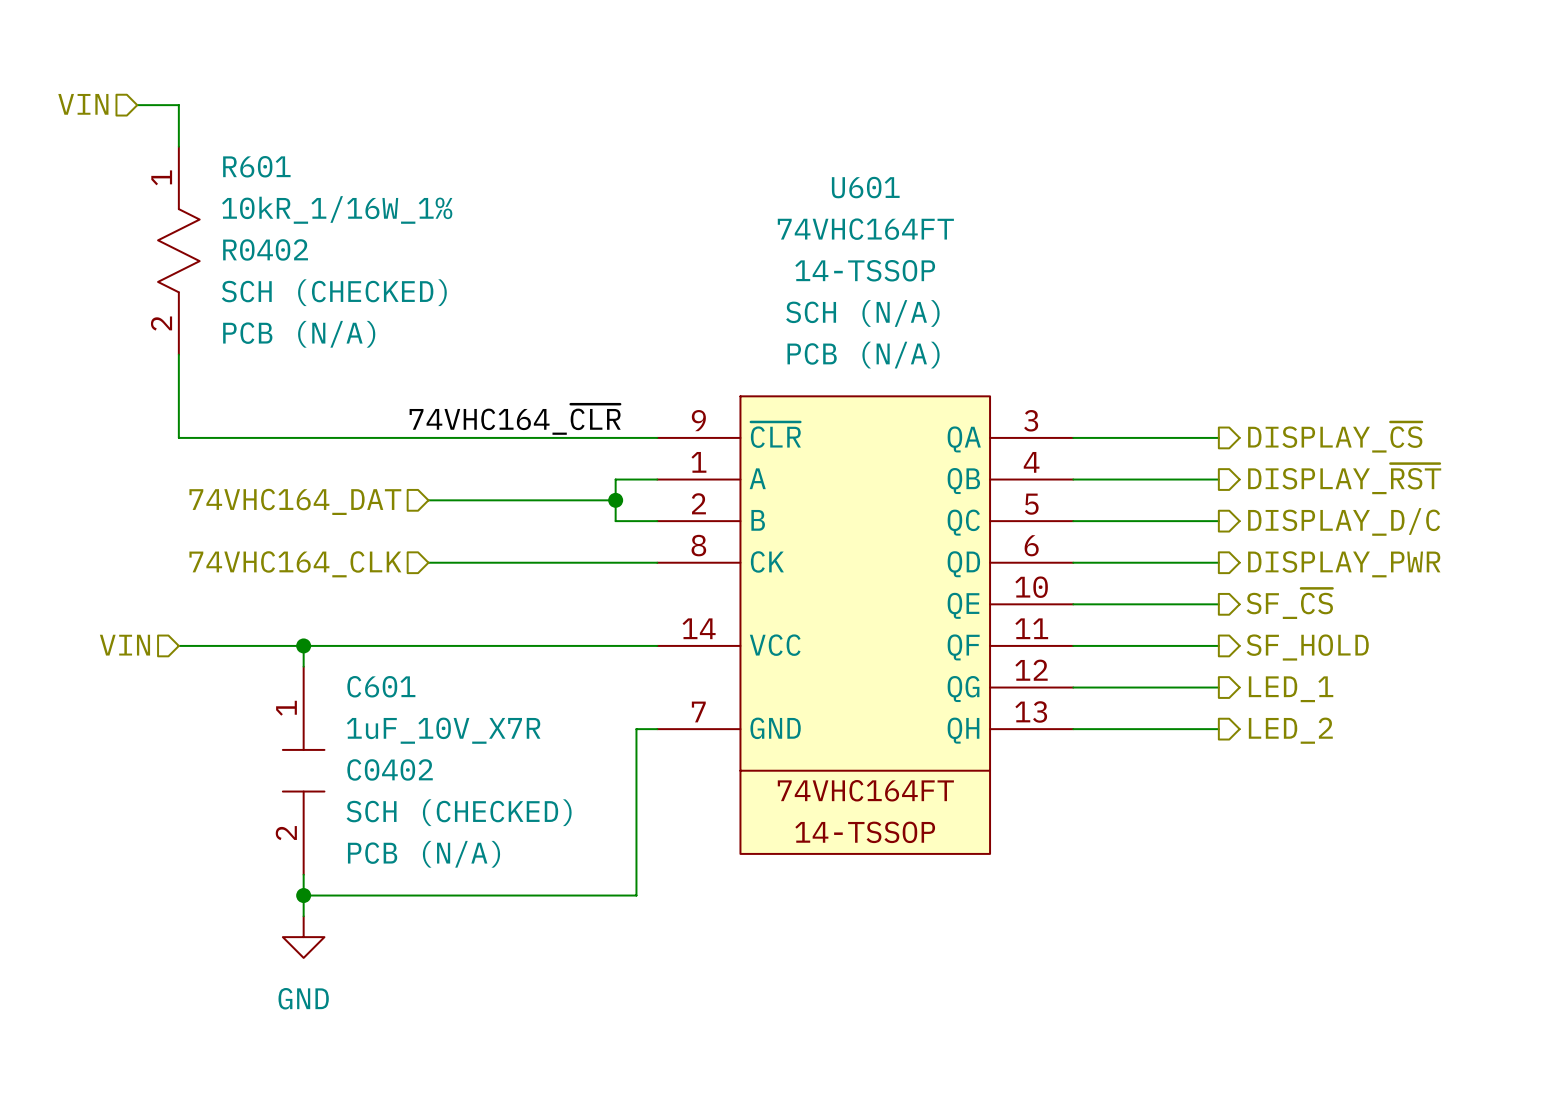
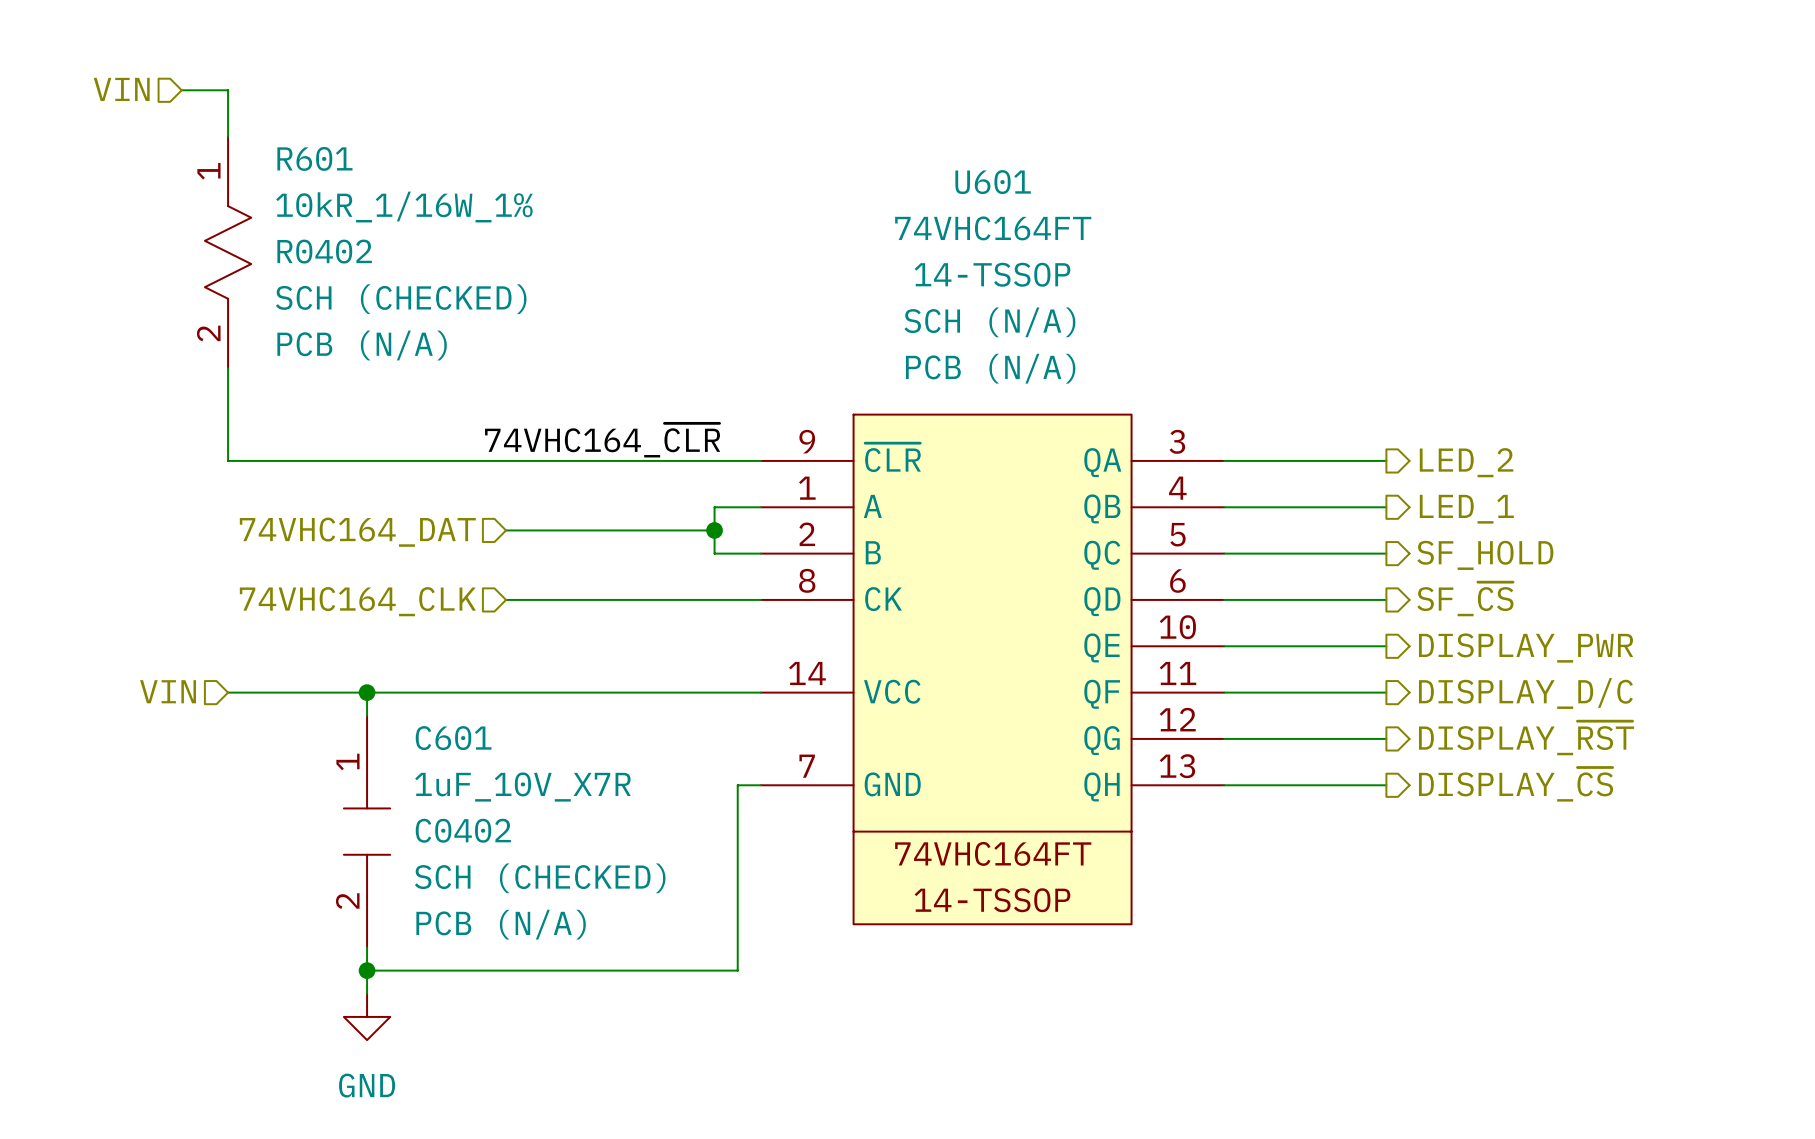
hierarchical label: DISPLAY_~{CS} (1335, 437) -> LED_2 (1466, 462)
hierarchical label: DISPLAY_~{RST} (1344, 478) -> LED_1 (1466, 509)
hierarchical label: DISPLAY_D/C (1344, 521) -> SF_HOLD (1485, 555)
hierarchical label: DISPLAY_PWR (1344, 564) -> SF_~{CS} (1465, 599)
hierarchical label: SF_~{CS} (1289, 603) -> DISPLAY_PWR (1526, 648)
hierarchical label: SF_HOLD (1307, 647) -> DISPLAY_D/C (1525, 693)
hierarchical label: LED_1 (1291, 689) -> DISPLAY_~{RST} (1526, 738)
hierarchical label: LED_2 (1290, 730) -> DISPLAY_~{CS} (1516, 784)

